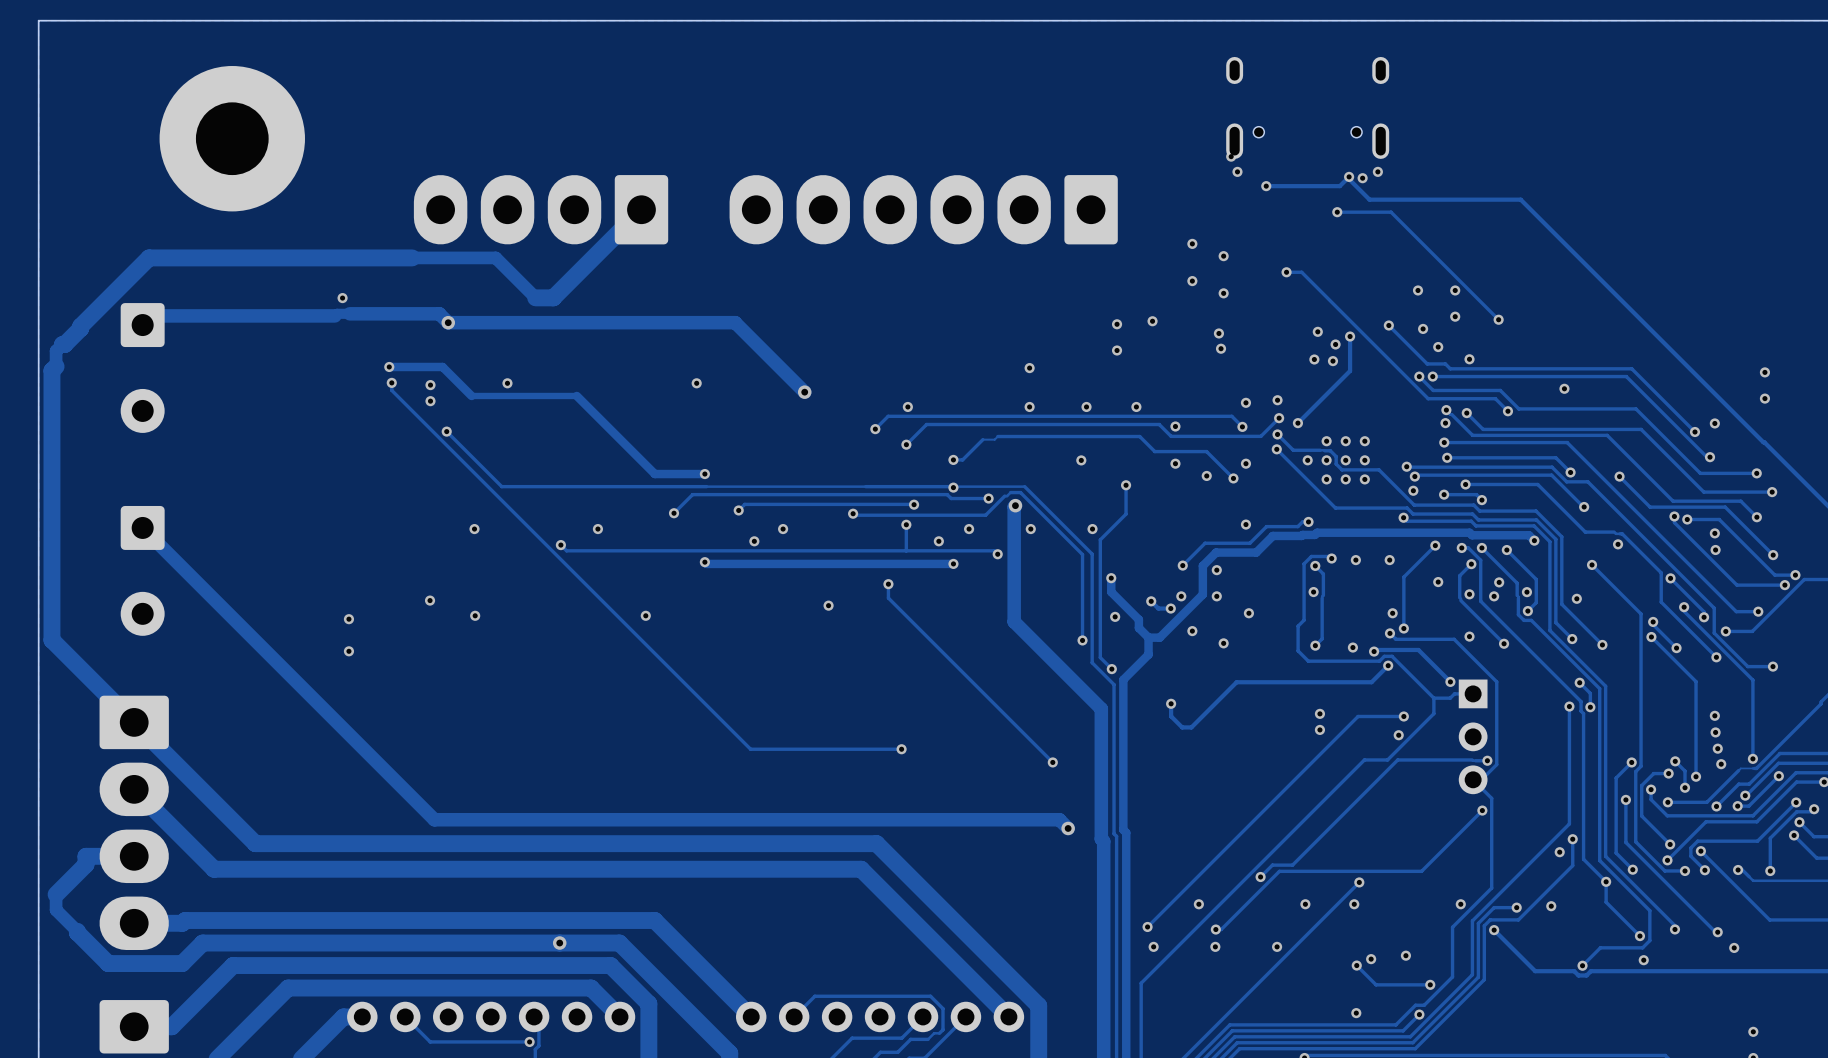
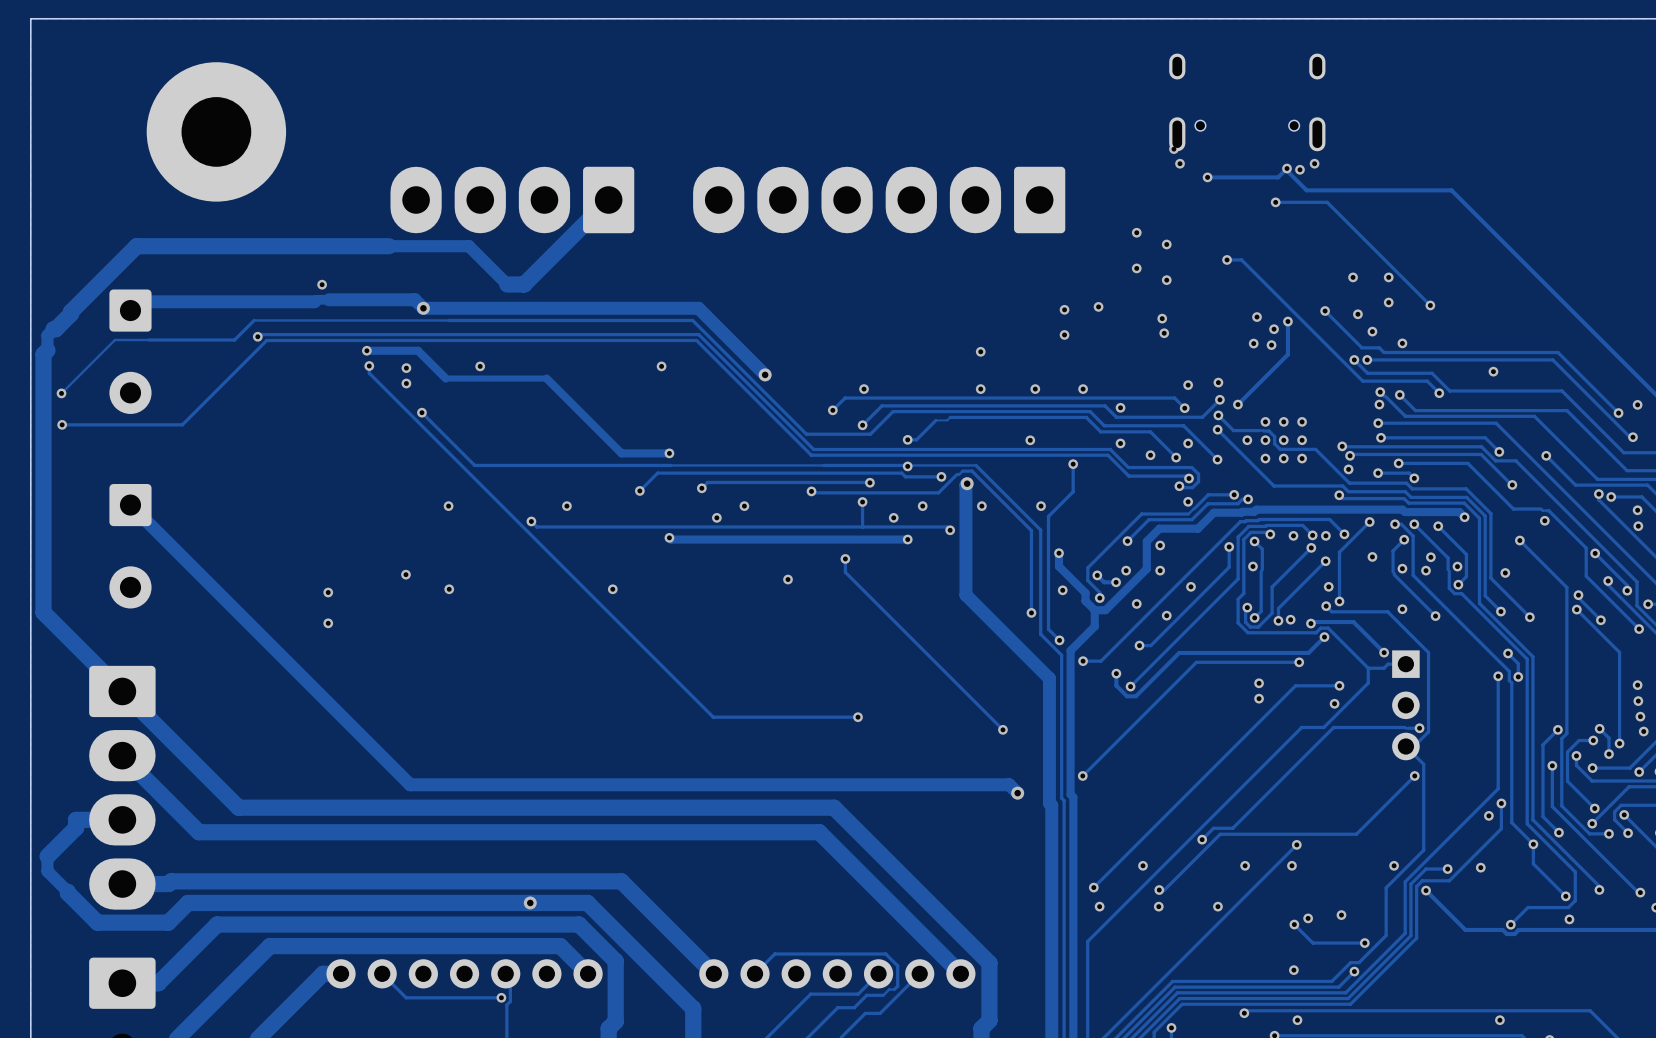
track: none -> (257, 336) (259, 334) (698, 334) (813, 449) (1110, 449) (1128, 467) (1191, 467) (1198, 474) (1198, 481) (1192, 487) (1179, 486)
via: none -> (257, 336)
track: none -> (61, 393) (114, 340) (234, 340) (254, 320) (692, 320) (806, 434) (870, 434) (893, 411) (1090, 411) (1104, 425) (1183, 425) (1217, 459)
via: none -> (61, 393)
track: none -> (62, 424) (182, 424) (266, 340) (696, 340) (811, 455) (1107, 455) (1128, 476) (1186, 476) (1189, 478)
via: none -> (62, 424)
via: none -> (1217, 459)
via: none -> (1189, 478)
via: none -> (1179, 486)
track: none -> (1234, 494) (1208, 494) (1188, 514) (1141, 514) (1087, 567) (1087, 580) (1099, 592) (1099, 598)
via: none -> (1234, 494)
track: none -> (1344, 534) (1329, 519) (1259, 519) (1240, 521) (1100, 661) (1083, 661)
via: none -> (1344, 534)
track: none -> (1312, 535) (1302, 525) (1248, 526) (1238, 537) (1238, 579) (1130, 686)
via: none -> (1312, 535)
track: none -> (1229, 546) (1229, 567) (1150, 645) (1139, 645)
via: none -> (1229, 546)
track: none -> (1311, 547) (1272, 587) (1272, 613) (1258, 627) (1250, 627) (1245, 622) (1245, 609) (1247, 607)
via: none -> (1311, 547)
track: none -> (1325, 561) (1278, 608) (1278, 620)
via: none -> (1325, 561)
via: none -> (1099, 598)
via: none -> (1247, 607)
via: none -> (1278, 620)
via: none -> (1139, 645)
via: none -> (1083, 661)
track: none -> (1299, 662) (1196, 662) (1082, 775)
via: none -> (1299, 662)
via: none -> (1130, 686)
via: none -> (1082, 775)

